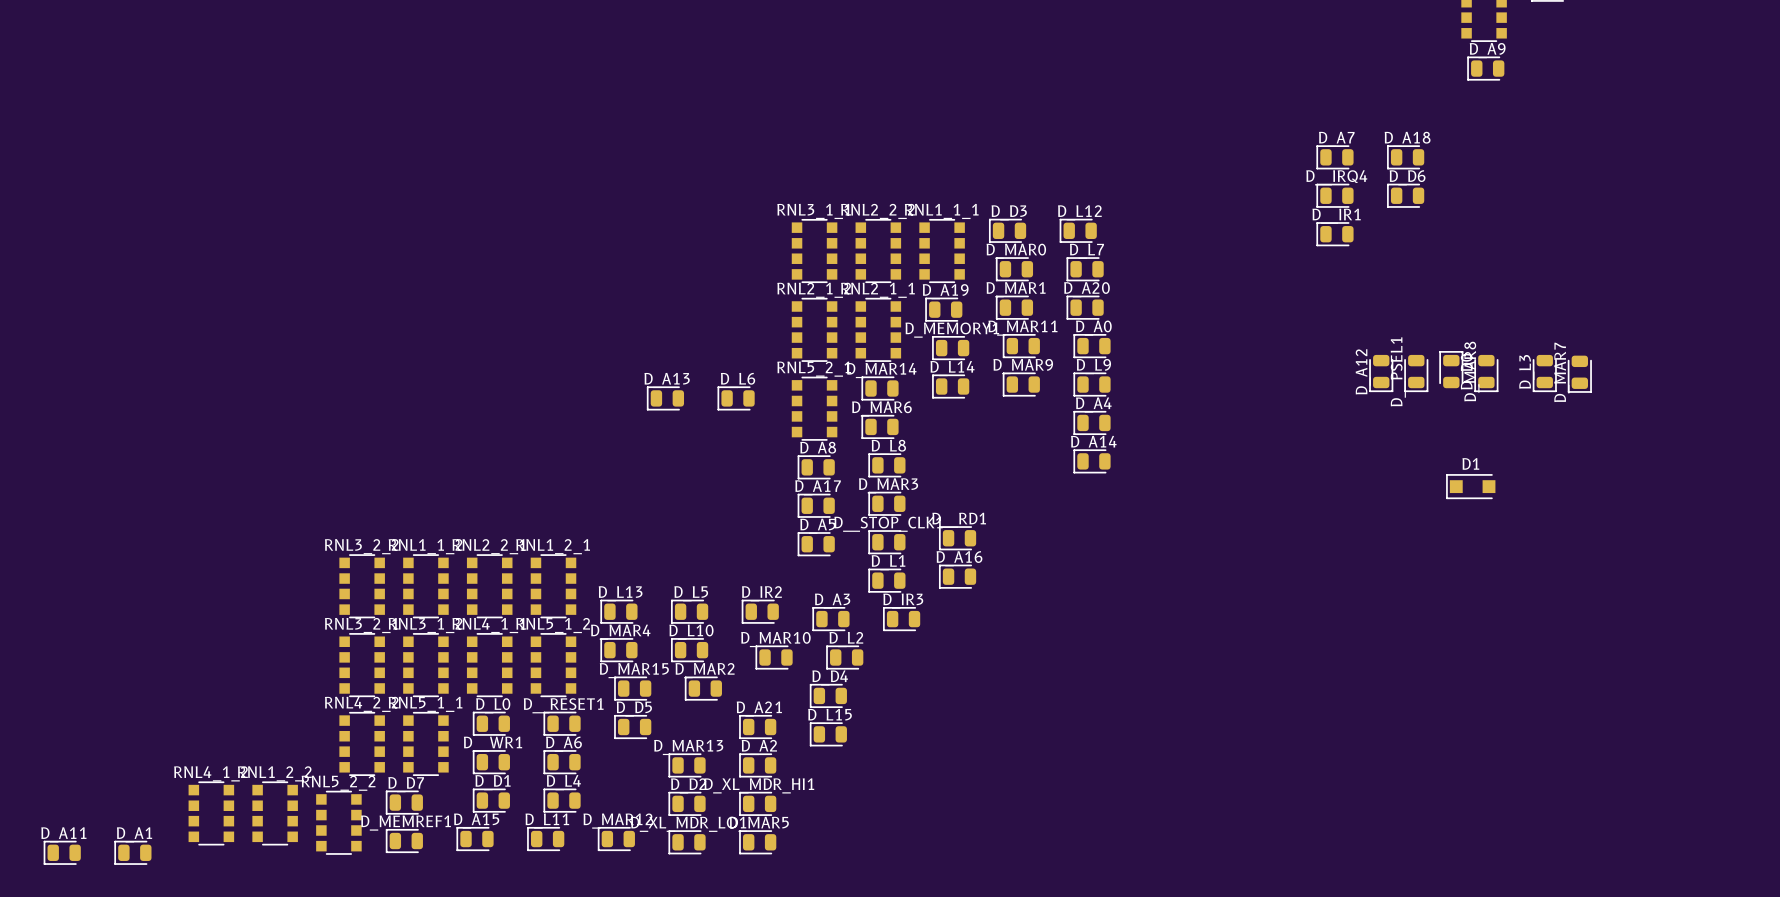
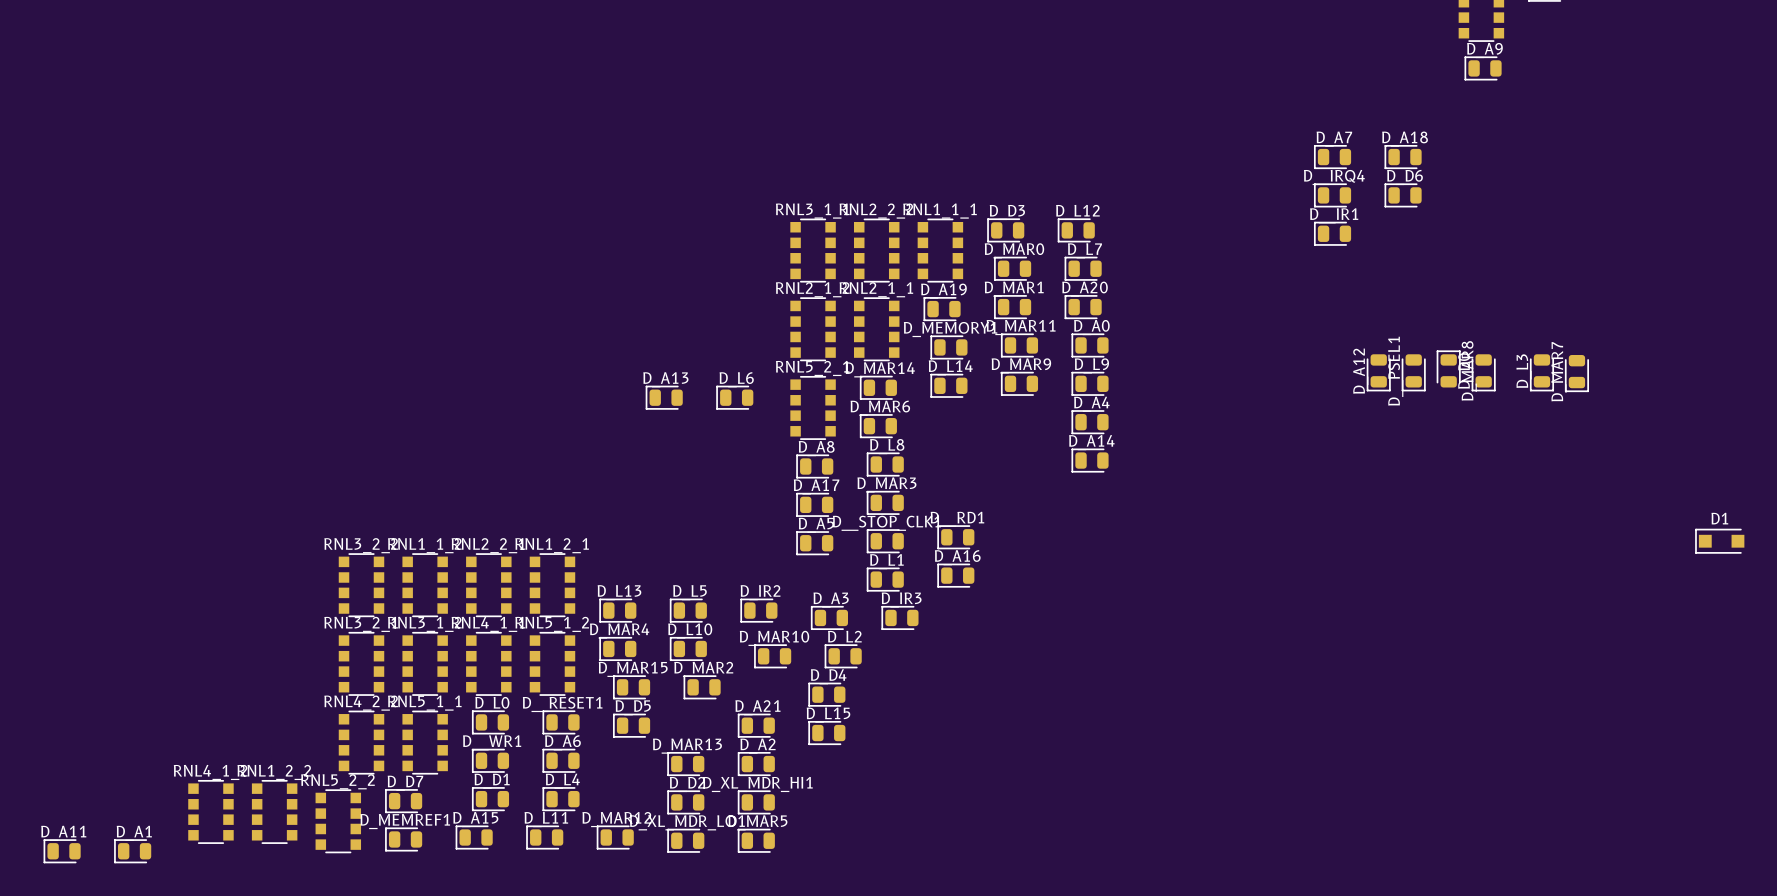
D1 position: (1470, 486) -> (1719, 541)

